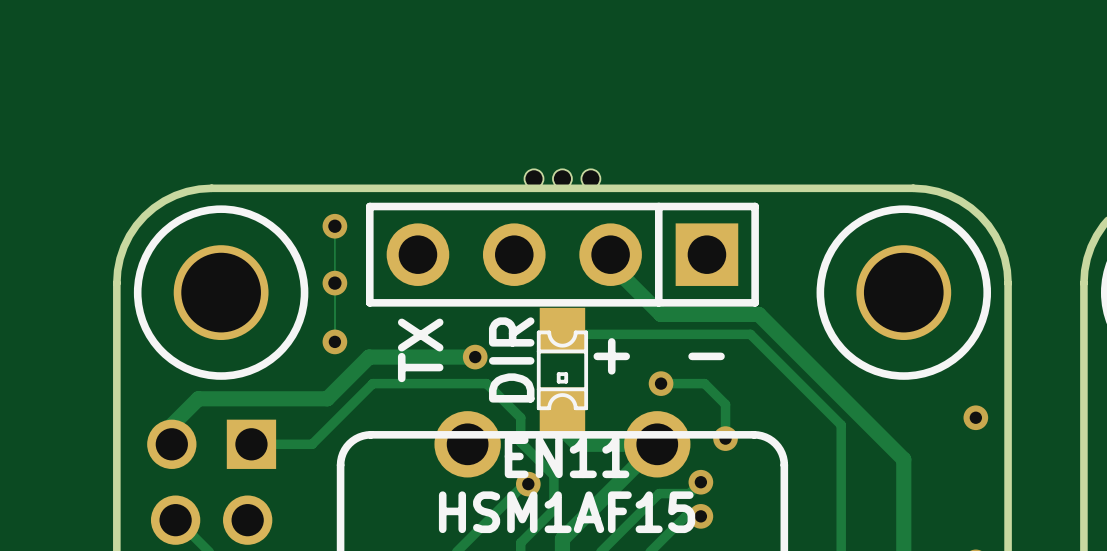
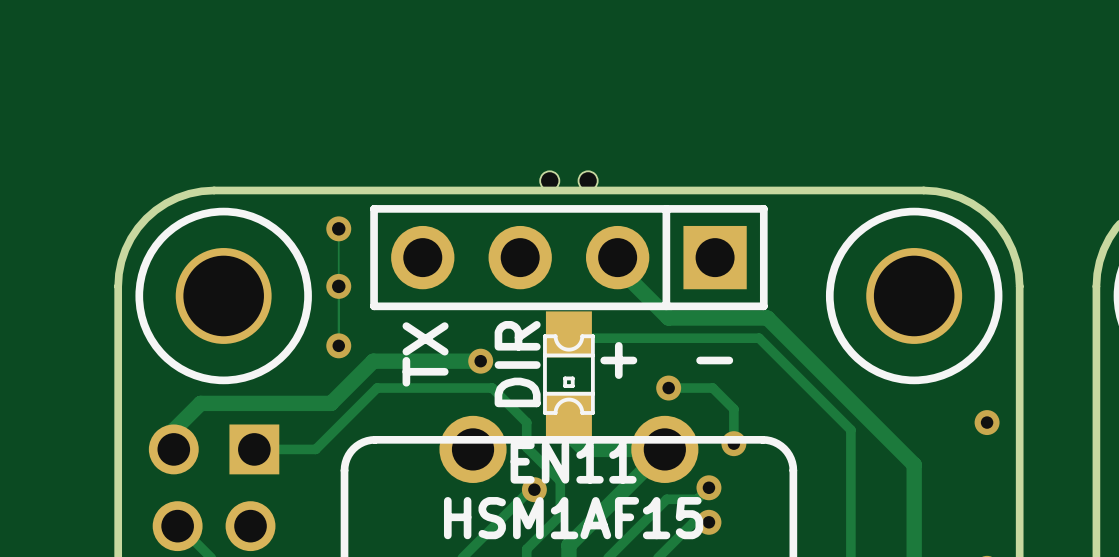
part: (534, 178) -> none
part: none -> (549, 180)
part: (562, 178) -> none
part: none -> (588, 180)
part: (590, 178) -> none

